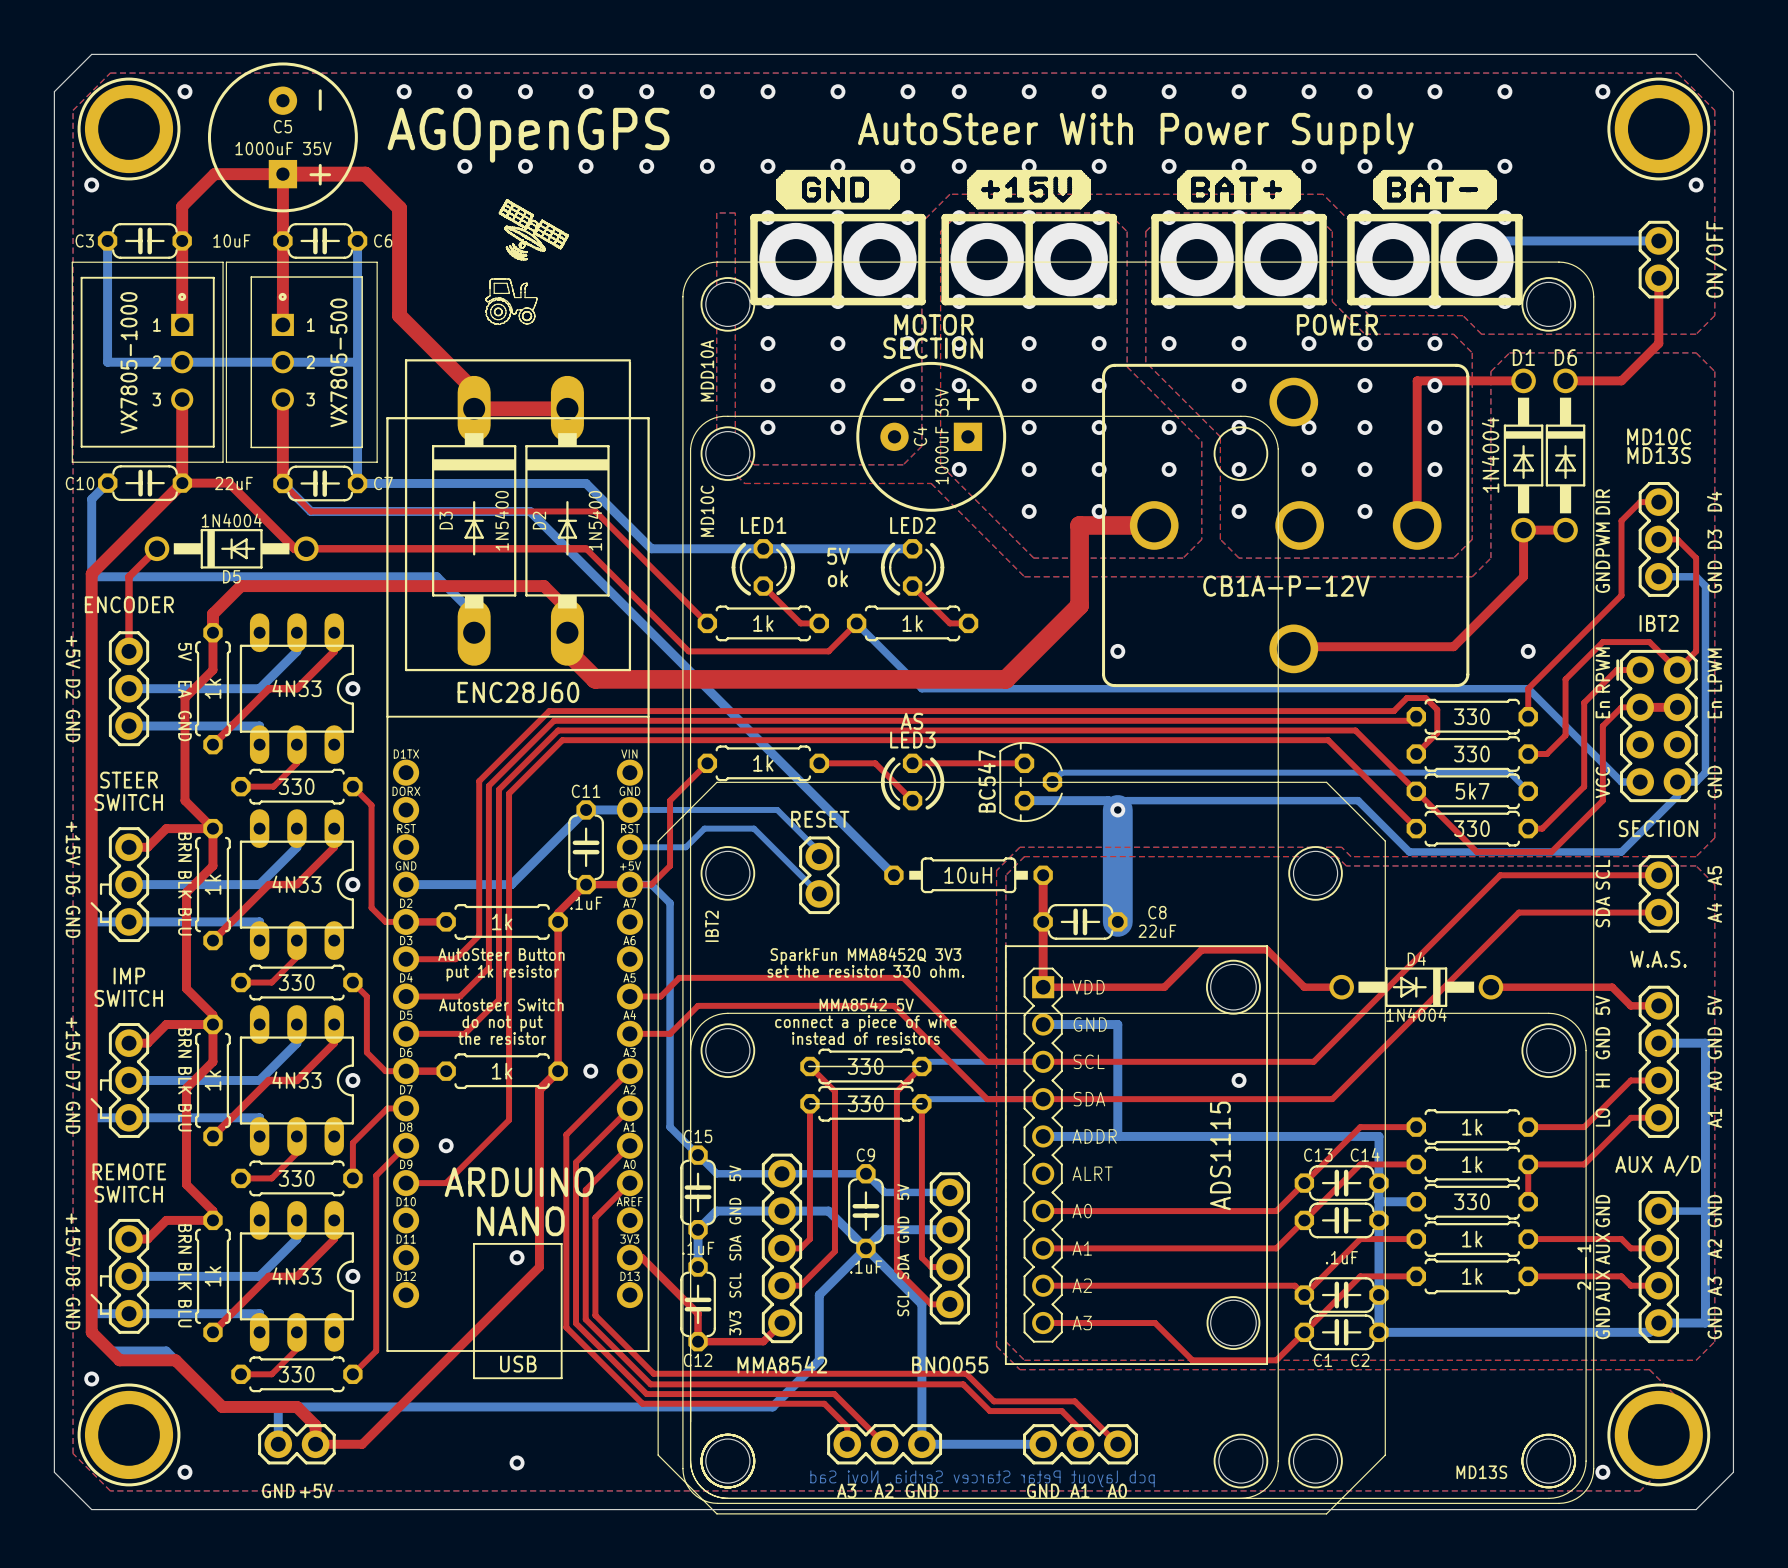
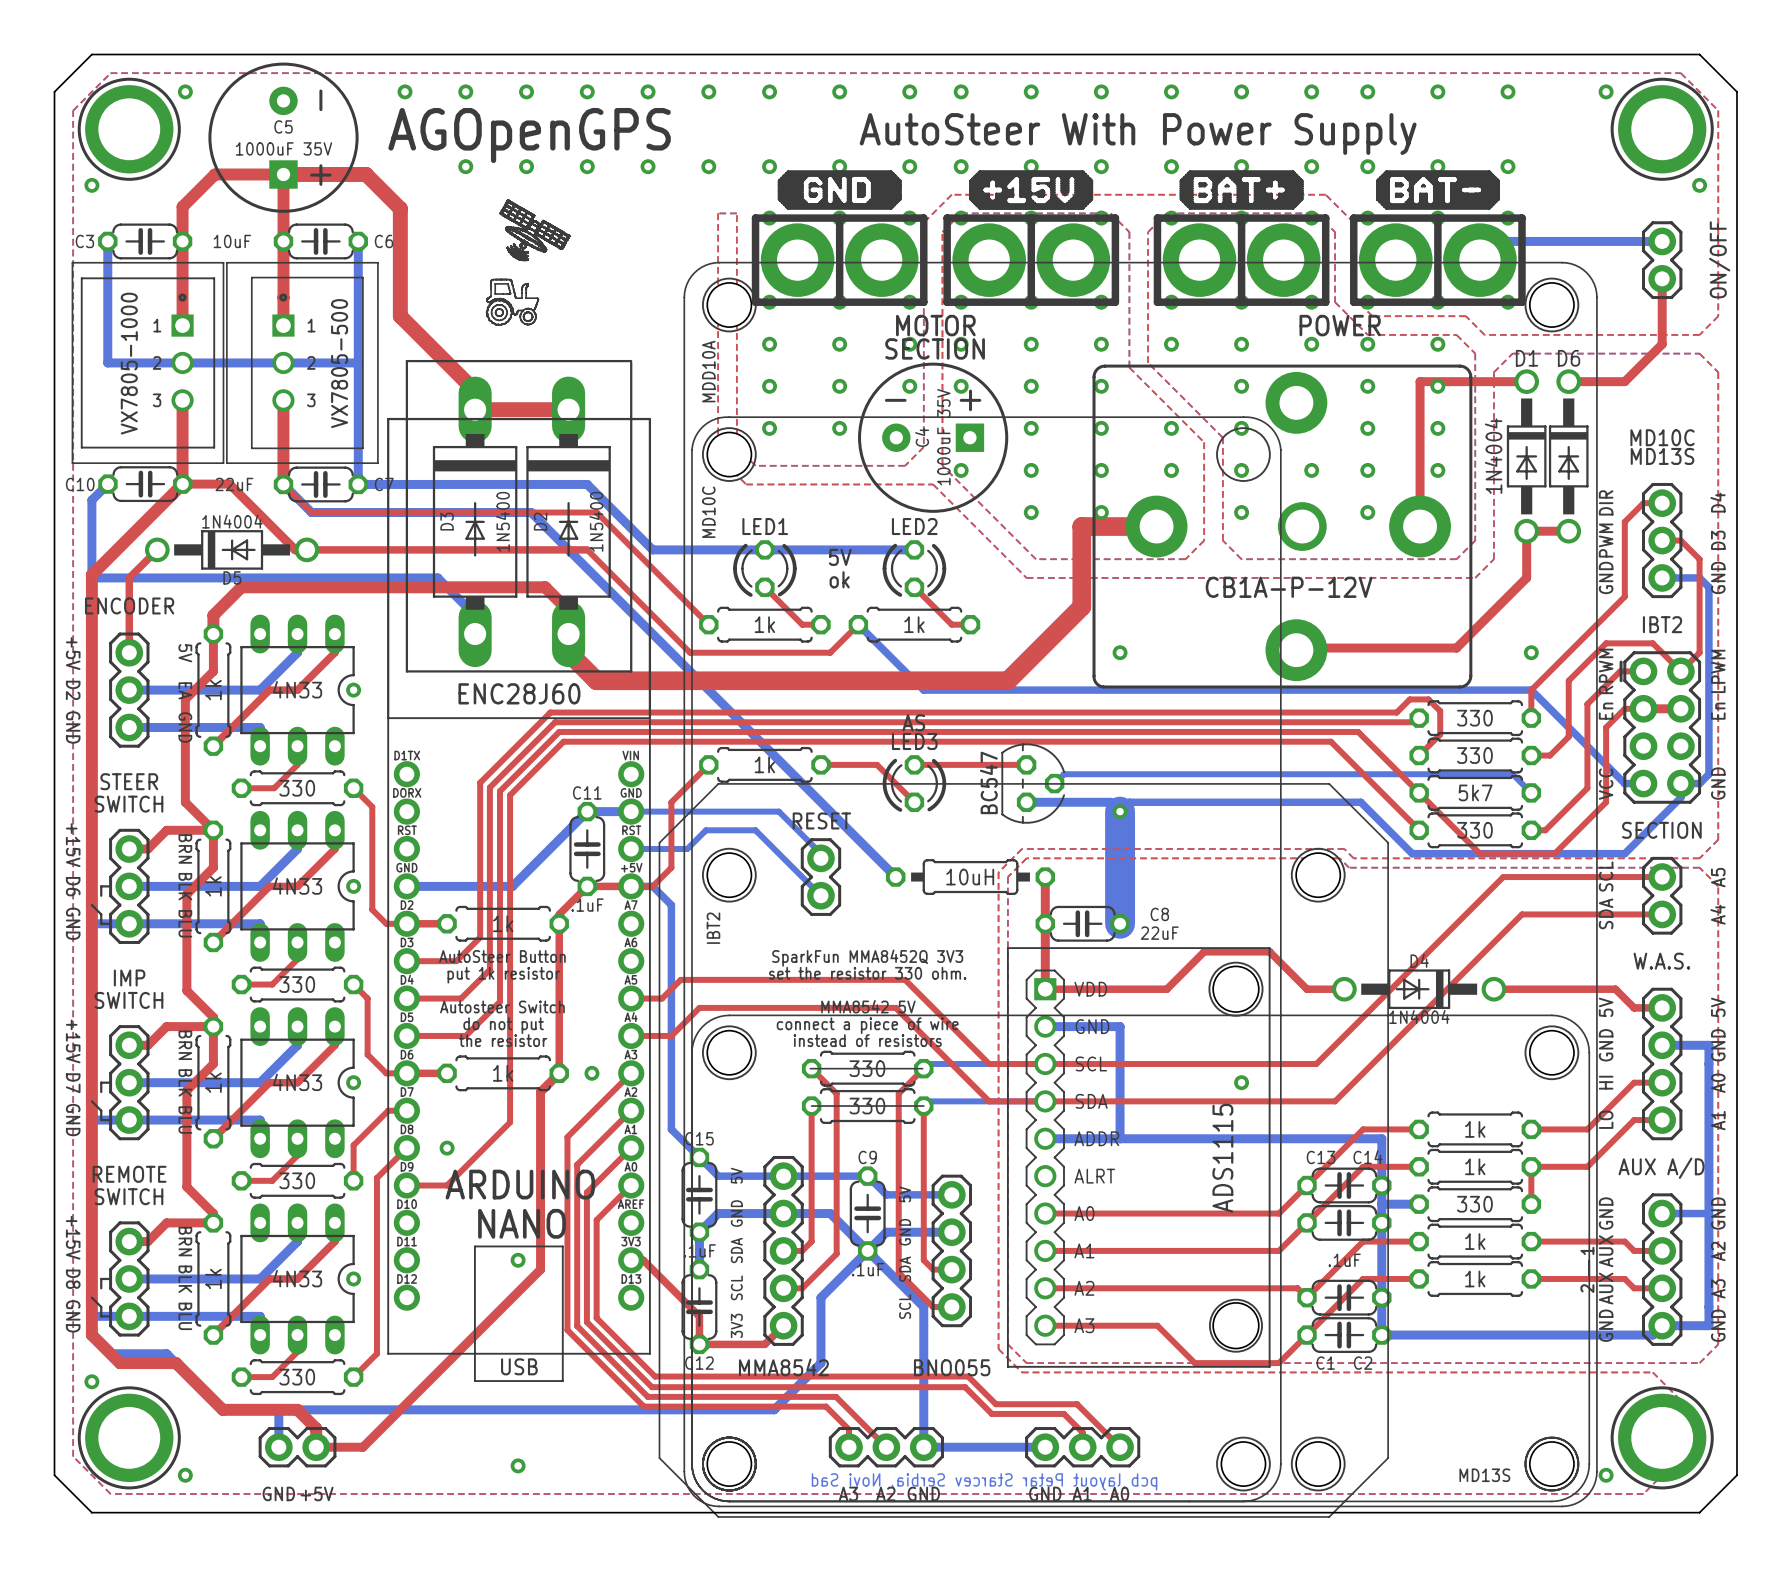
part footprint: [1102, 363, 1470, 688] -> [1092, 364, 1473, 689]
via: (1309, 427) -> none

